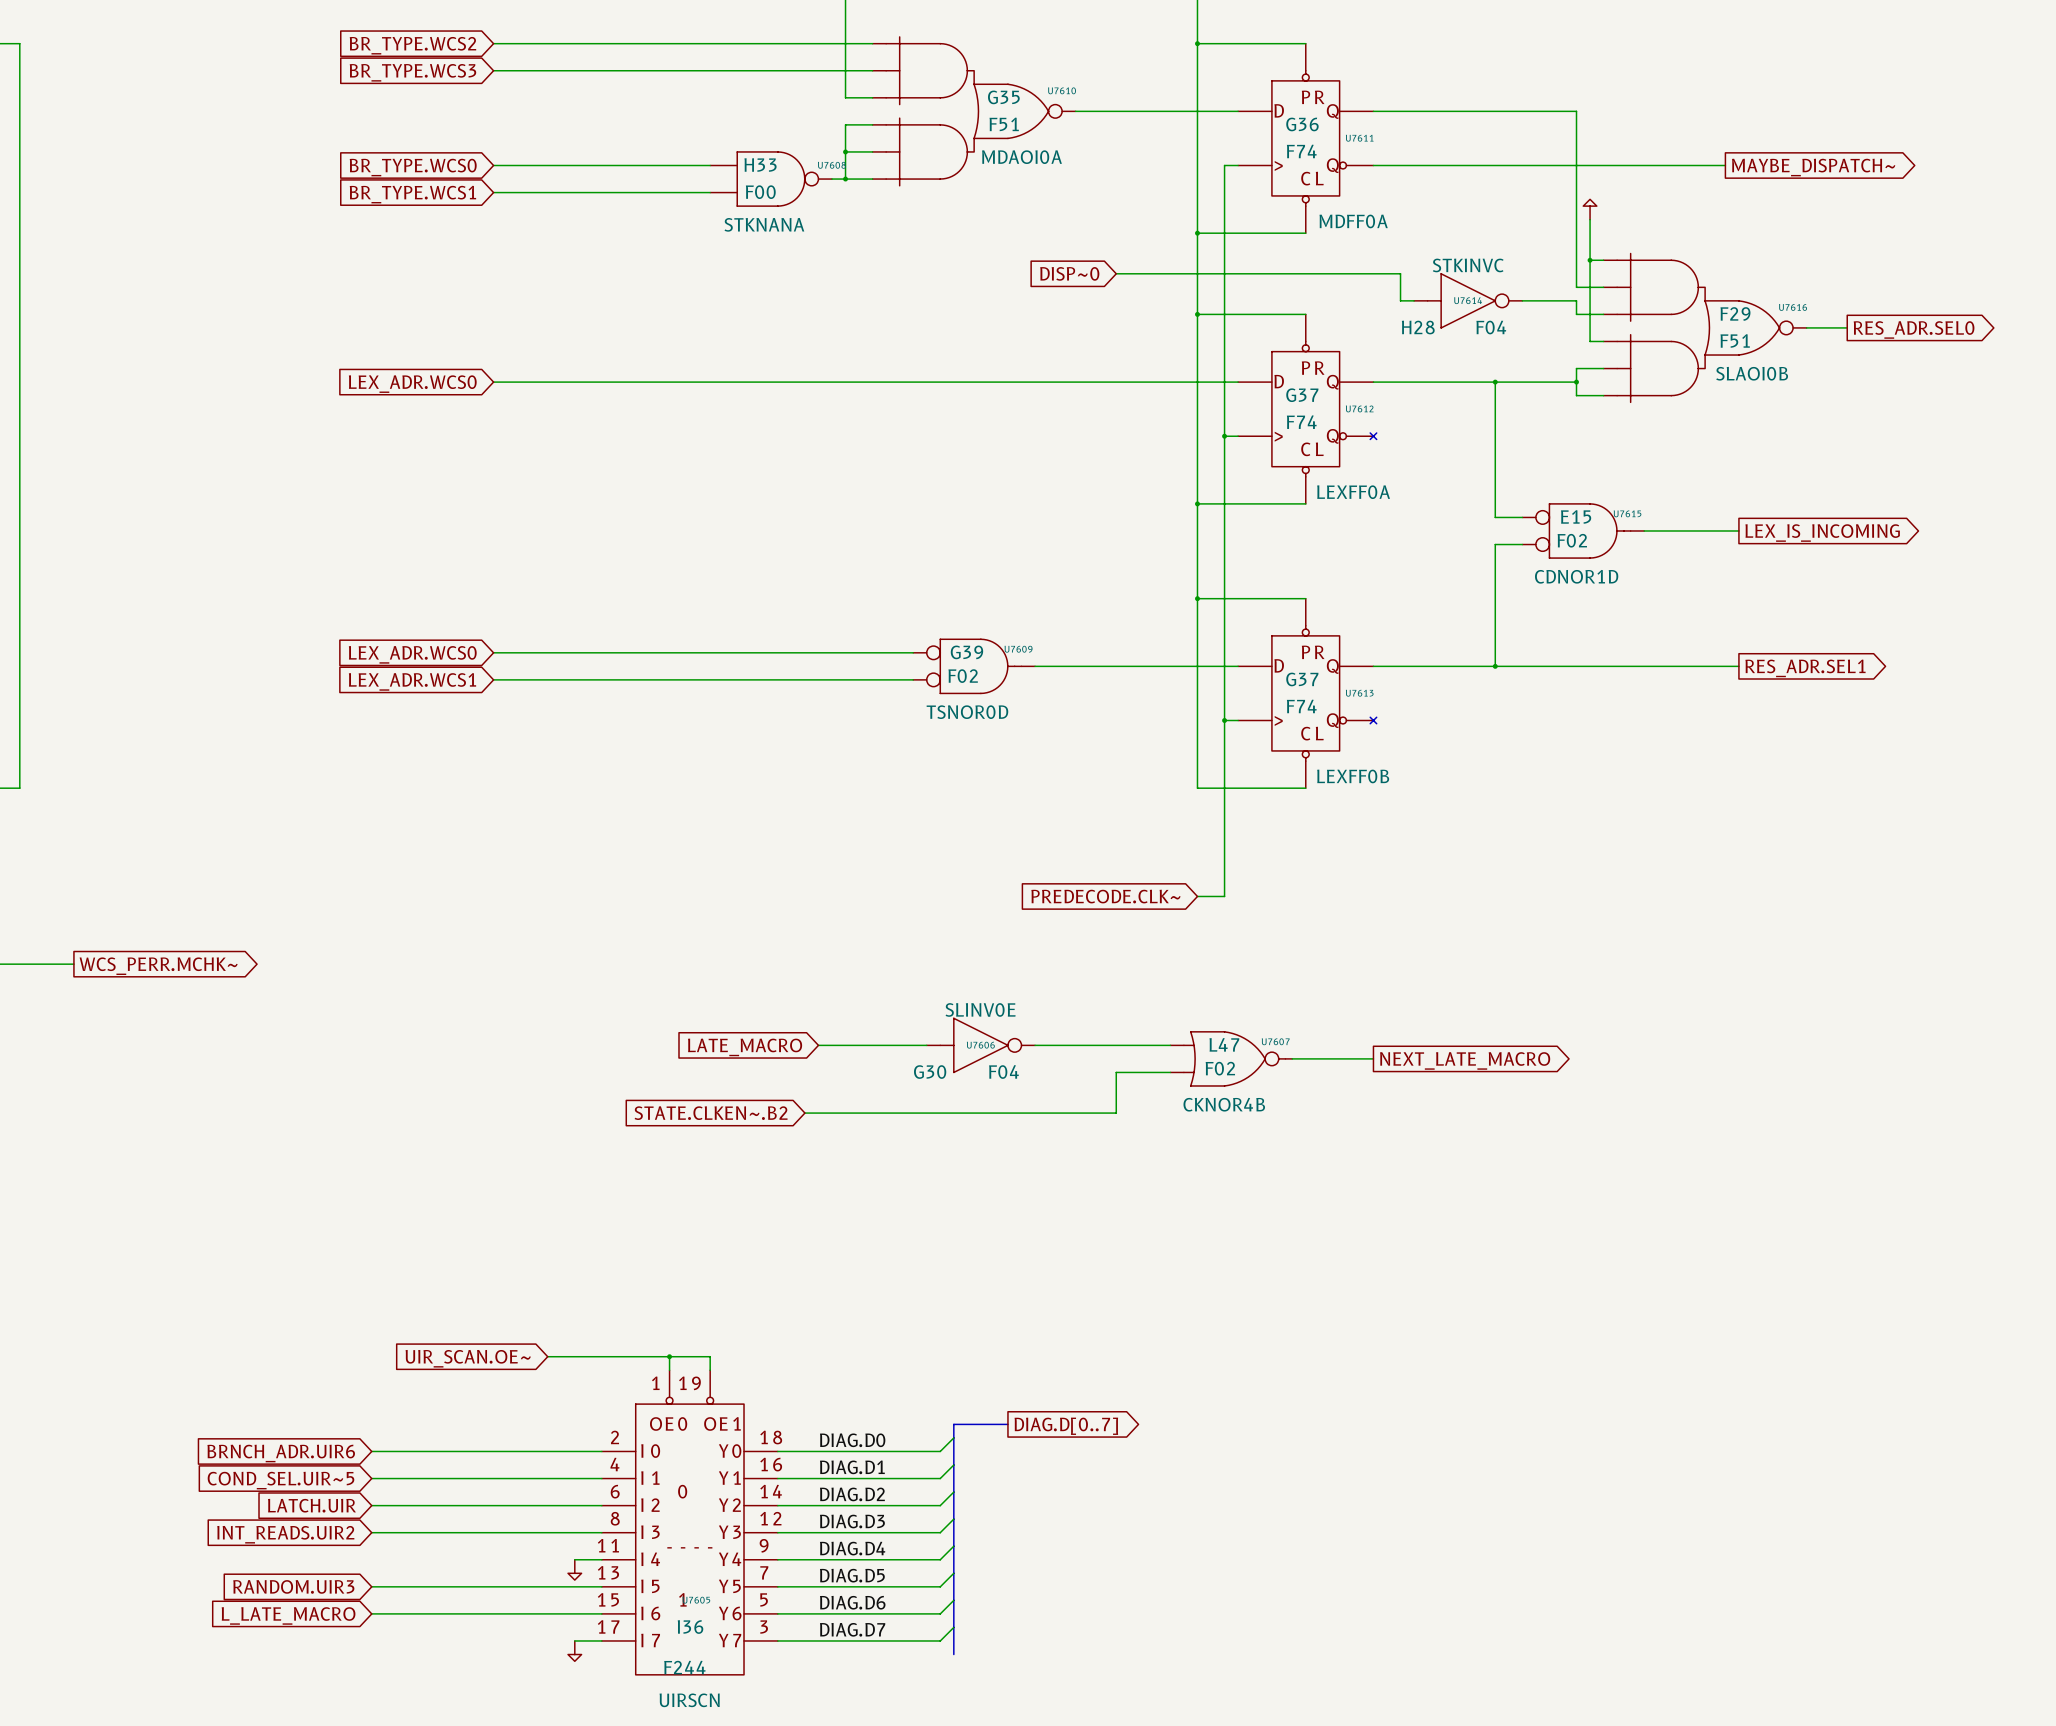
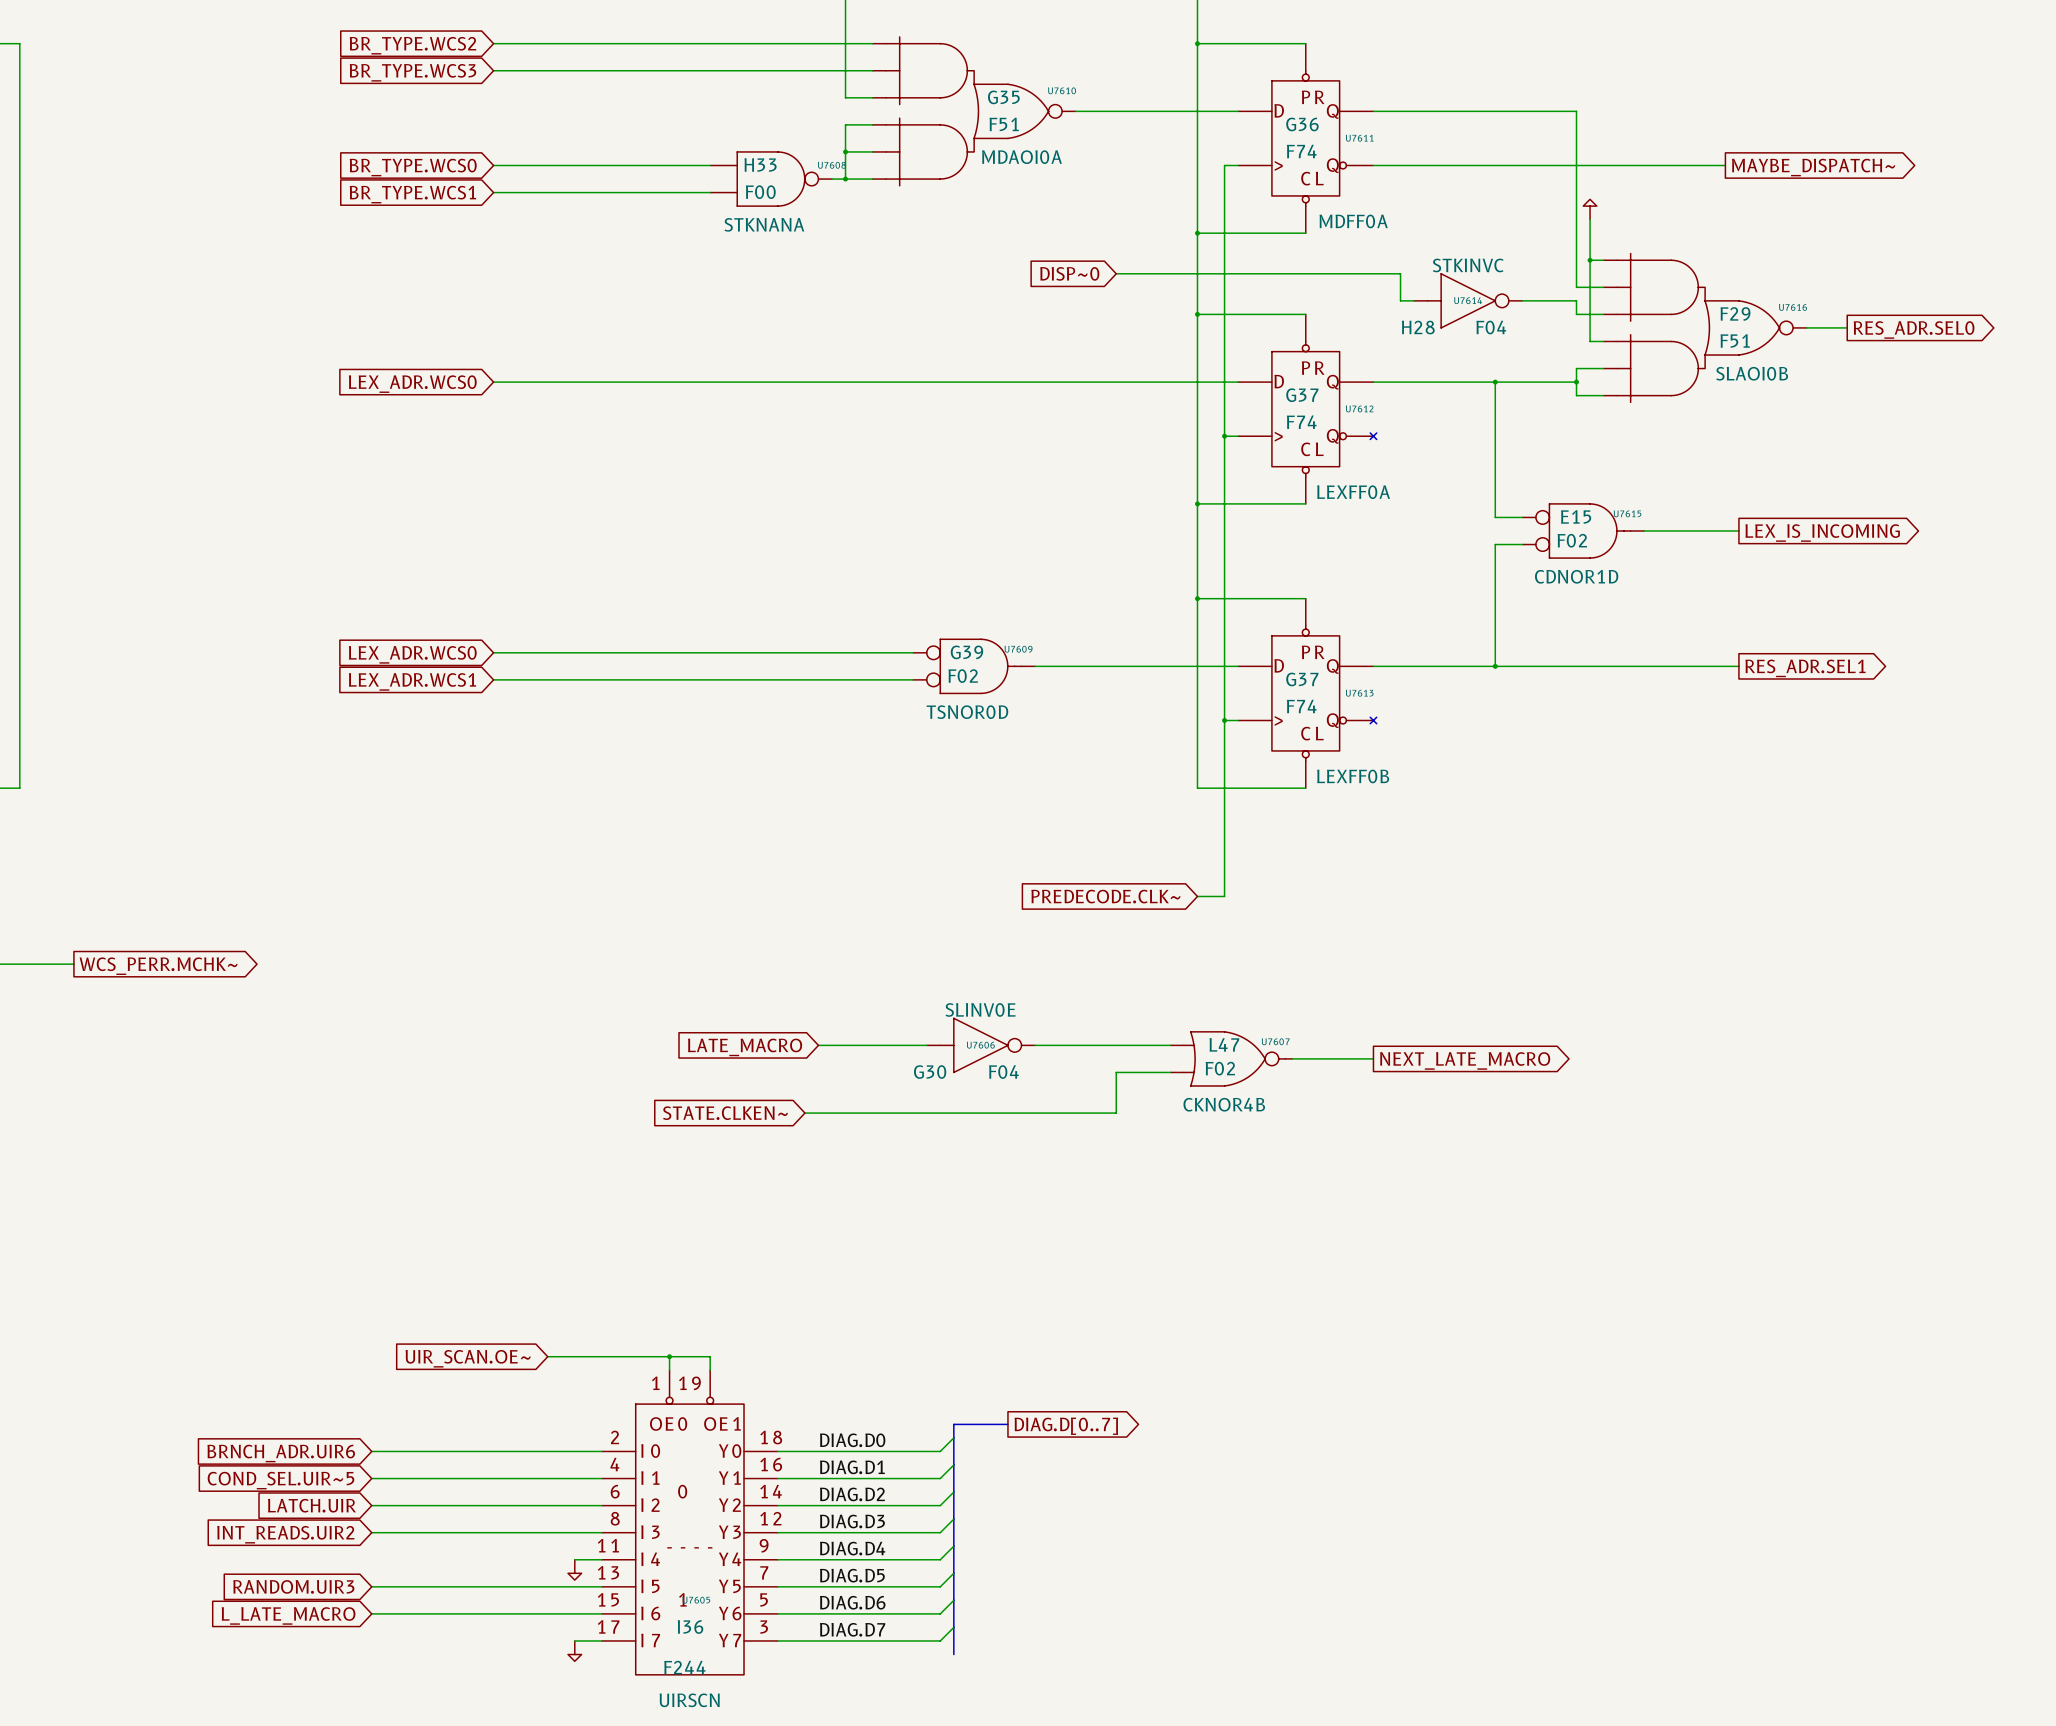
global label: STATE.CLKEN~.B2 (711, 1113) -> STATE.CLKEN~ (725, 1113)

